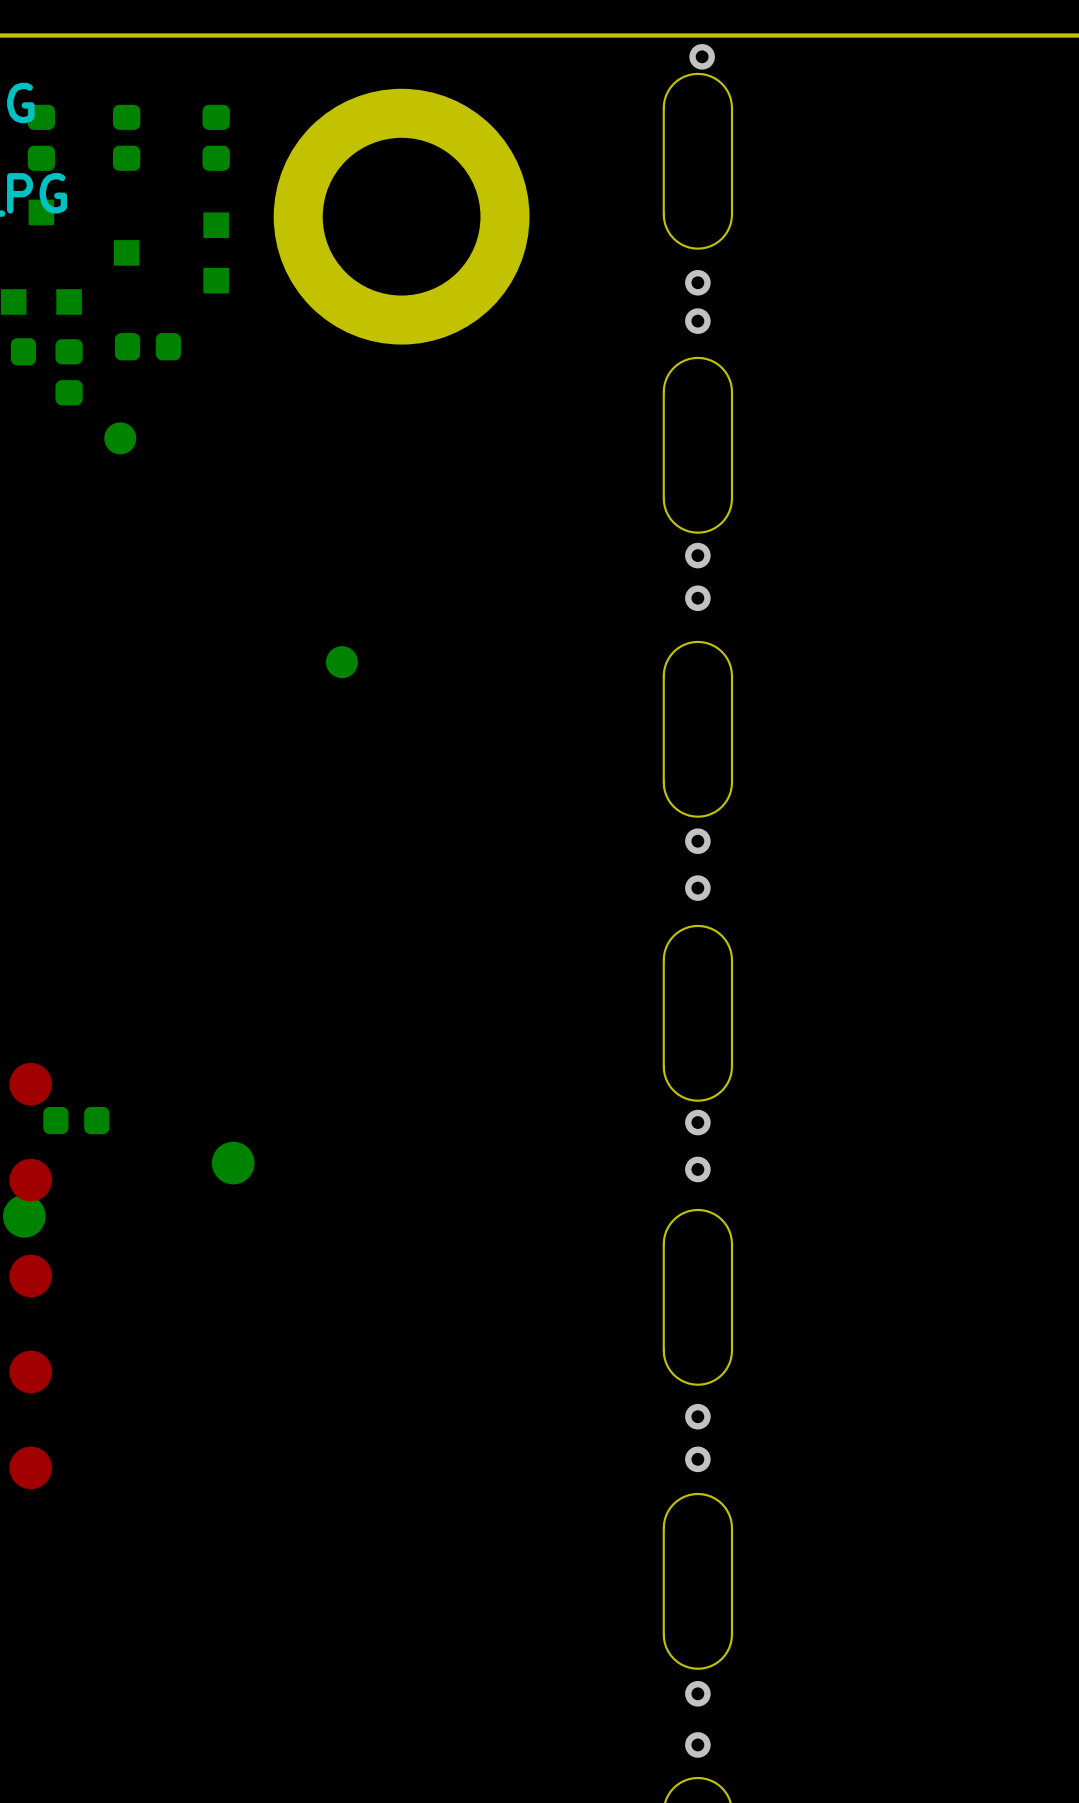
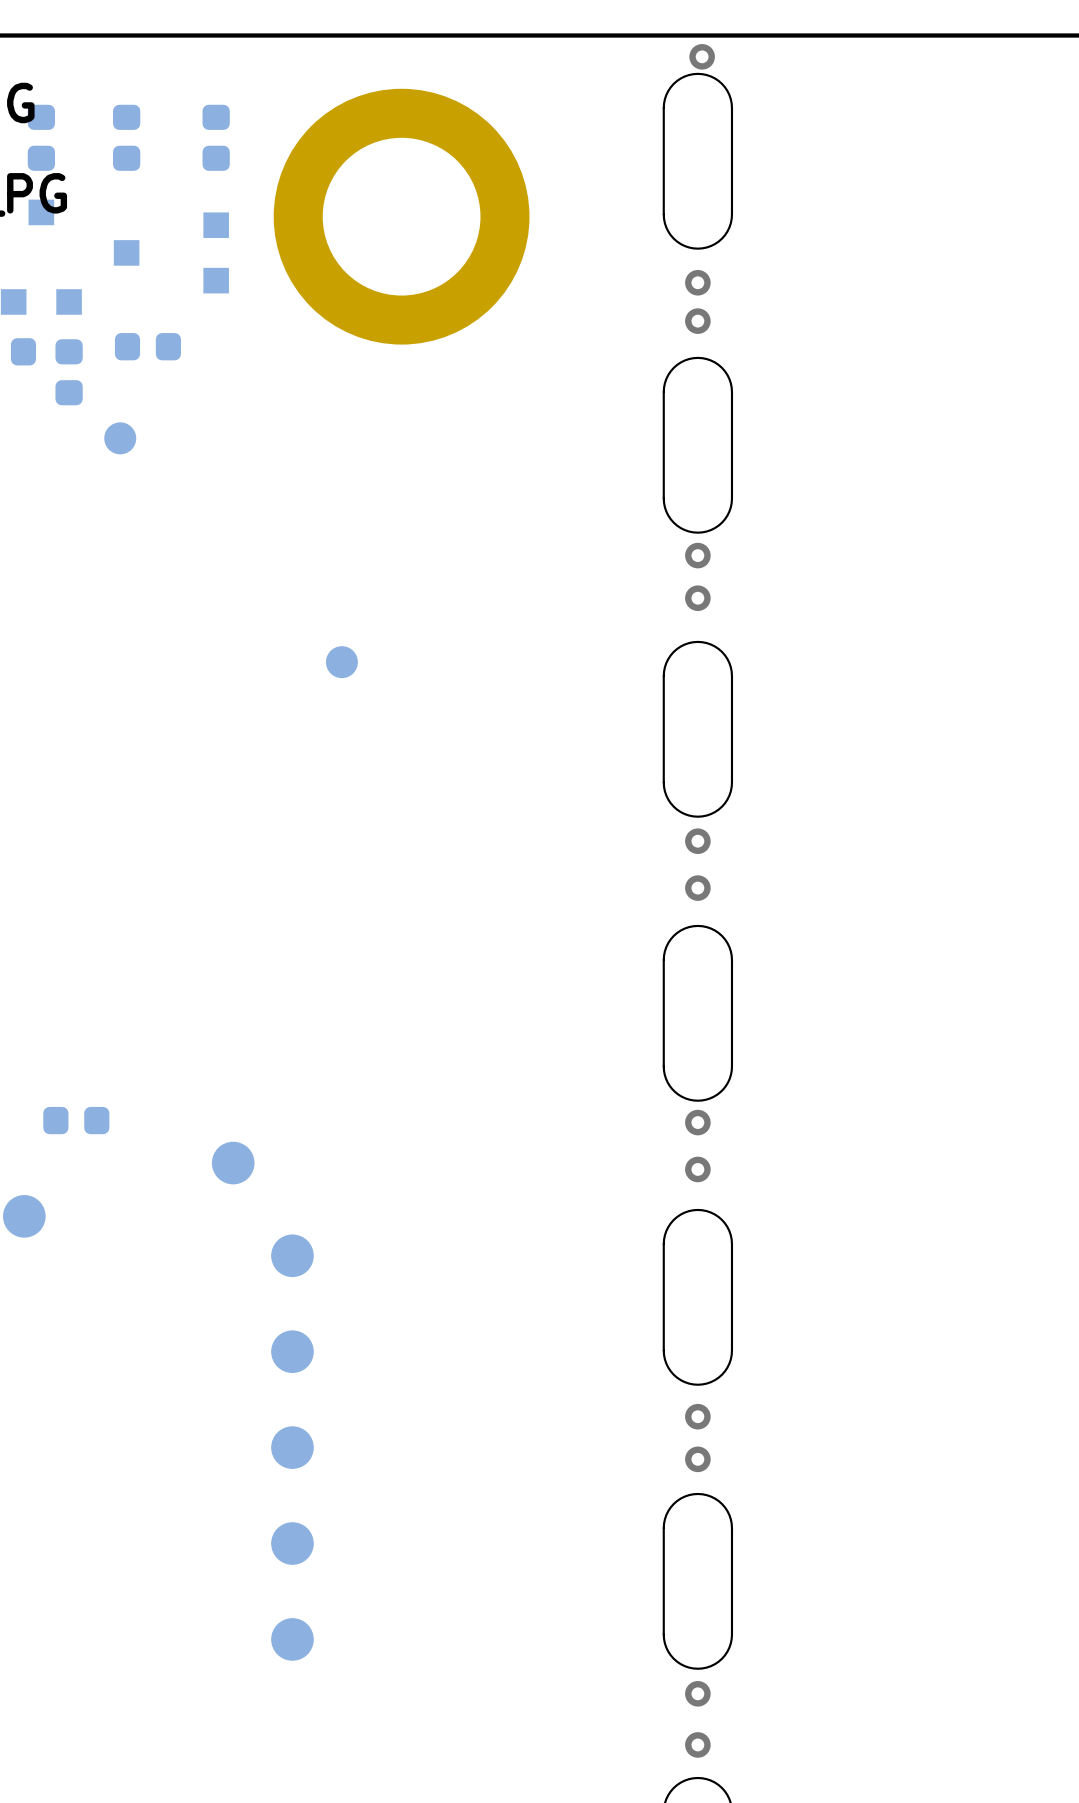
part side: top (30, 1084) -> bottom (292, 1255)
part side: top (30, 1180) -> bottom (292, 1351)
part side: top (30, 1276) -> bottom (292, 1447)
part side: top (30, 1371) -> bottom (292, 1543)
part side: top (30, 1467) -> bottom (292, 1639)

